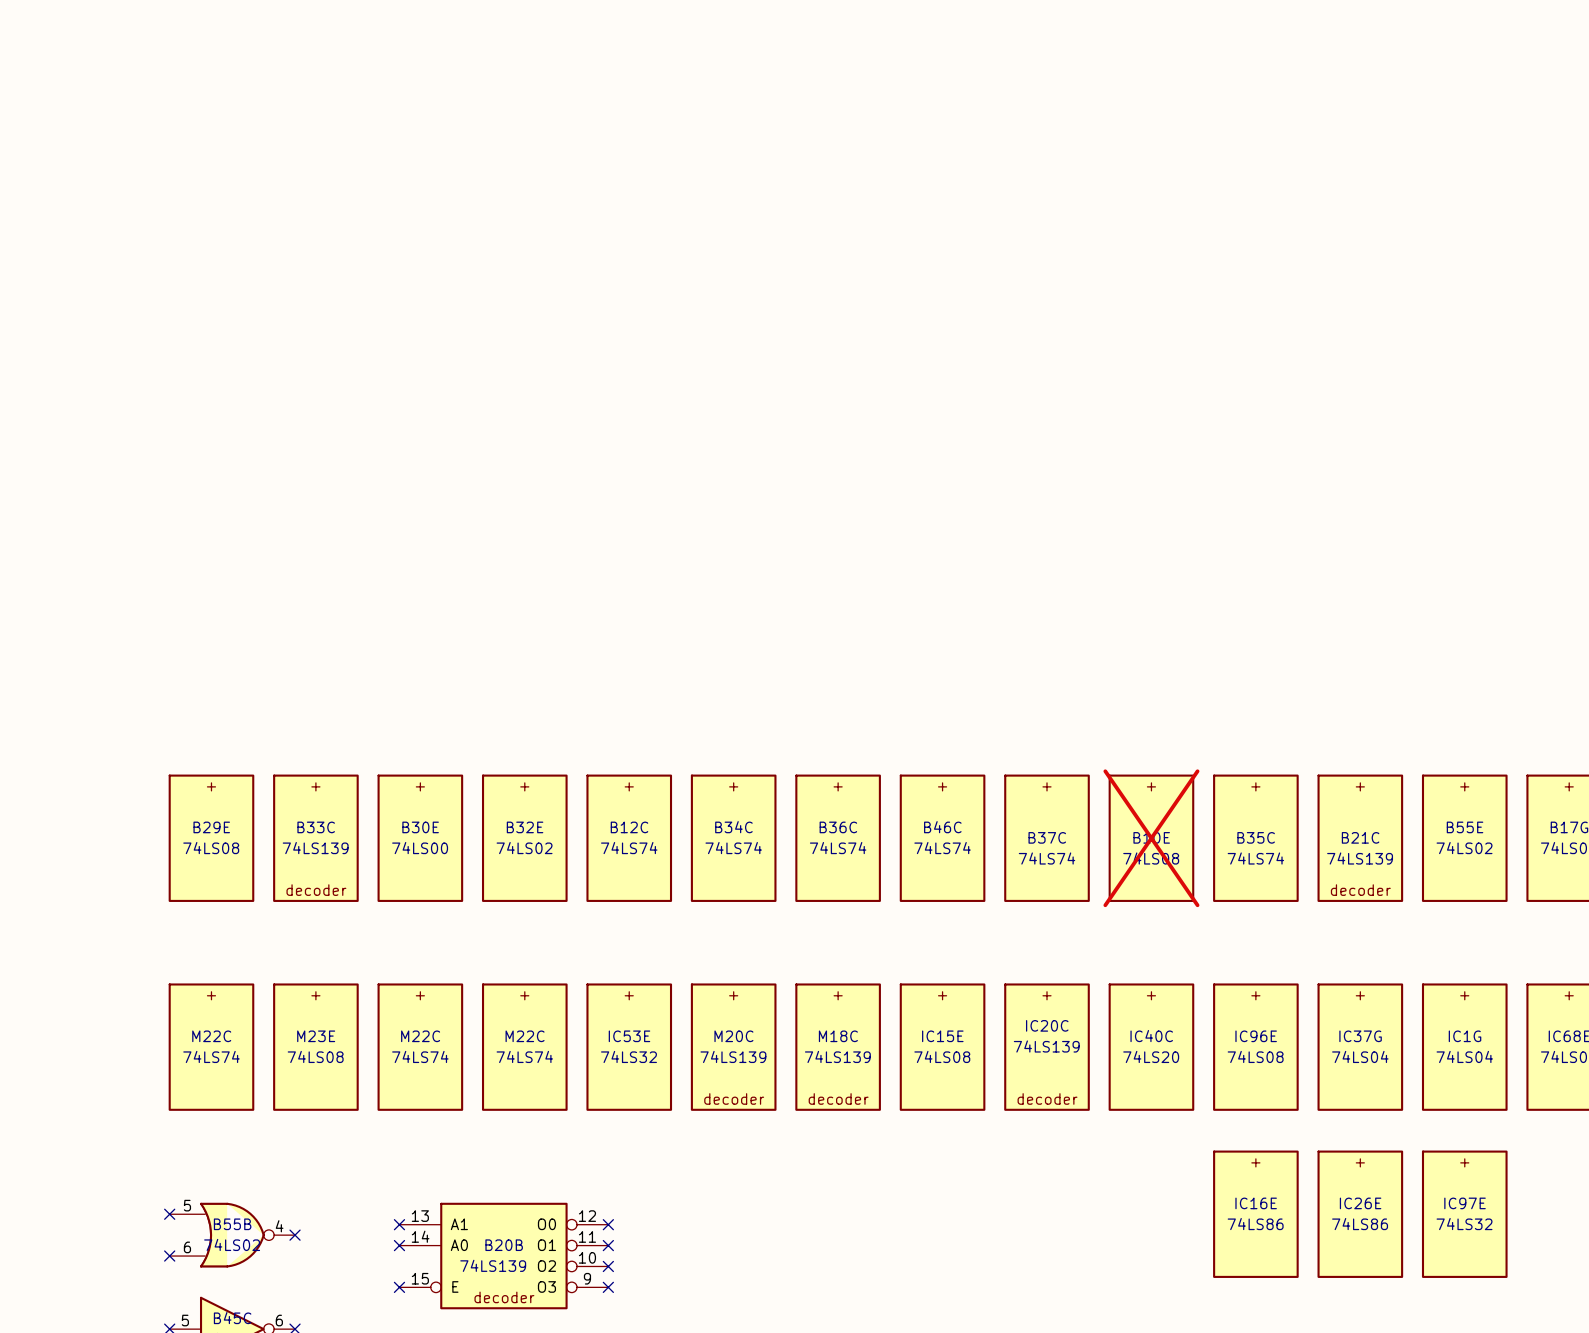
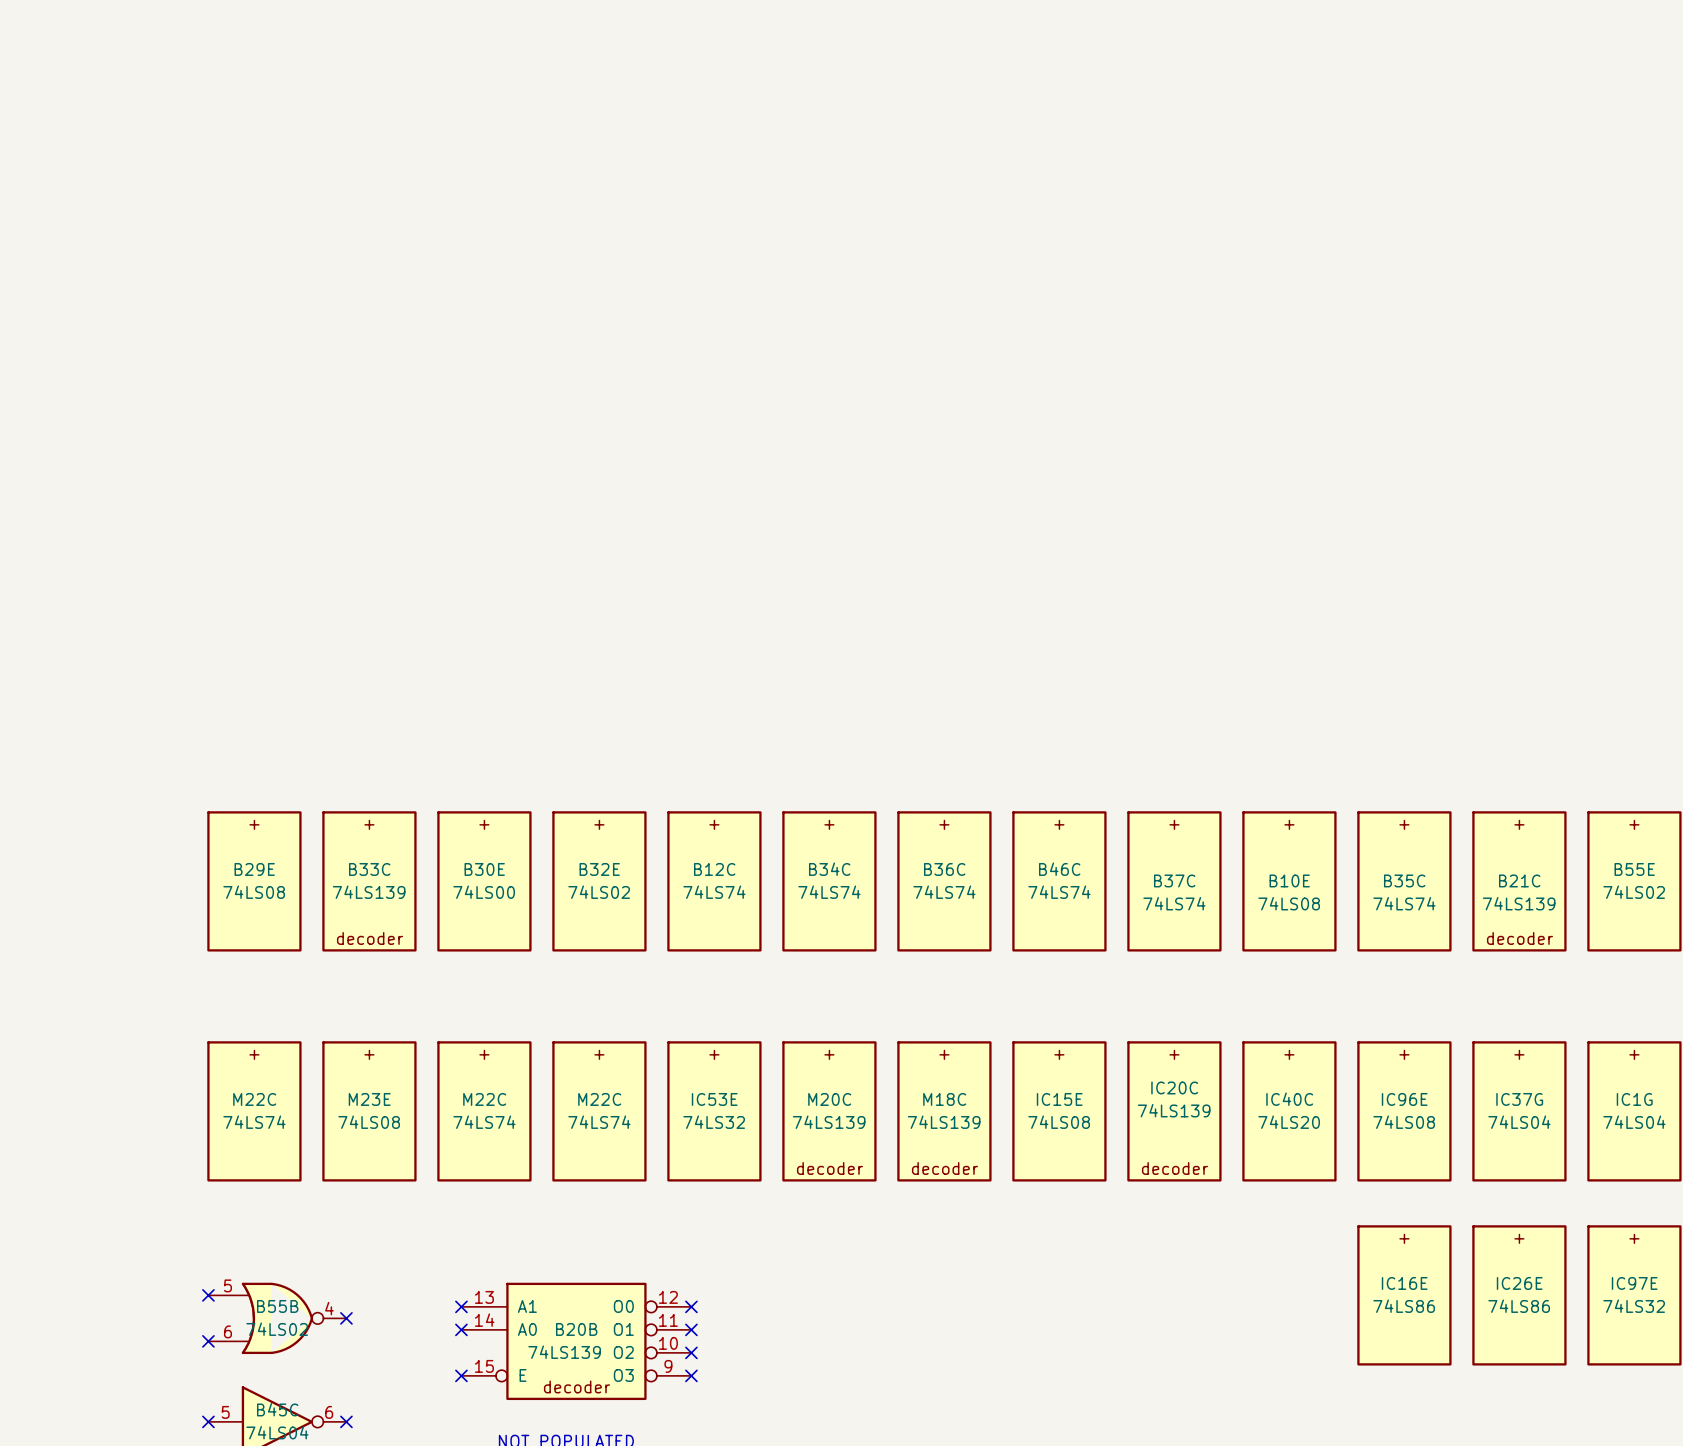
B10E do-not-place cross: (1151, 838) -> none

